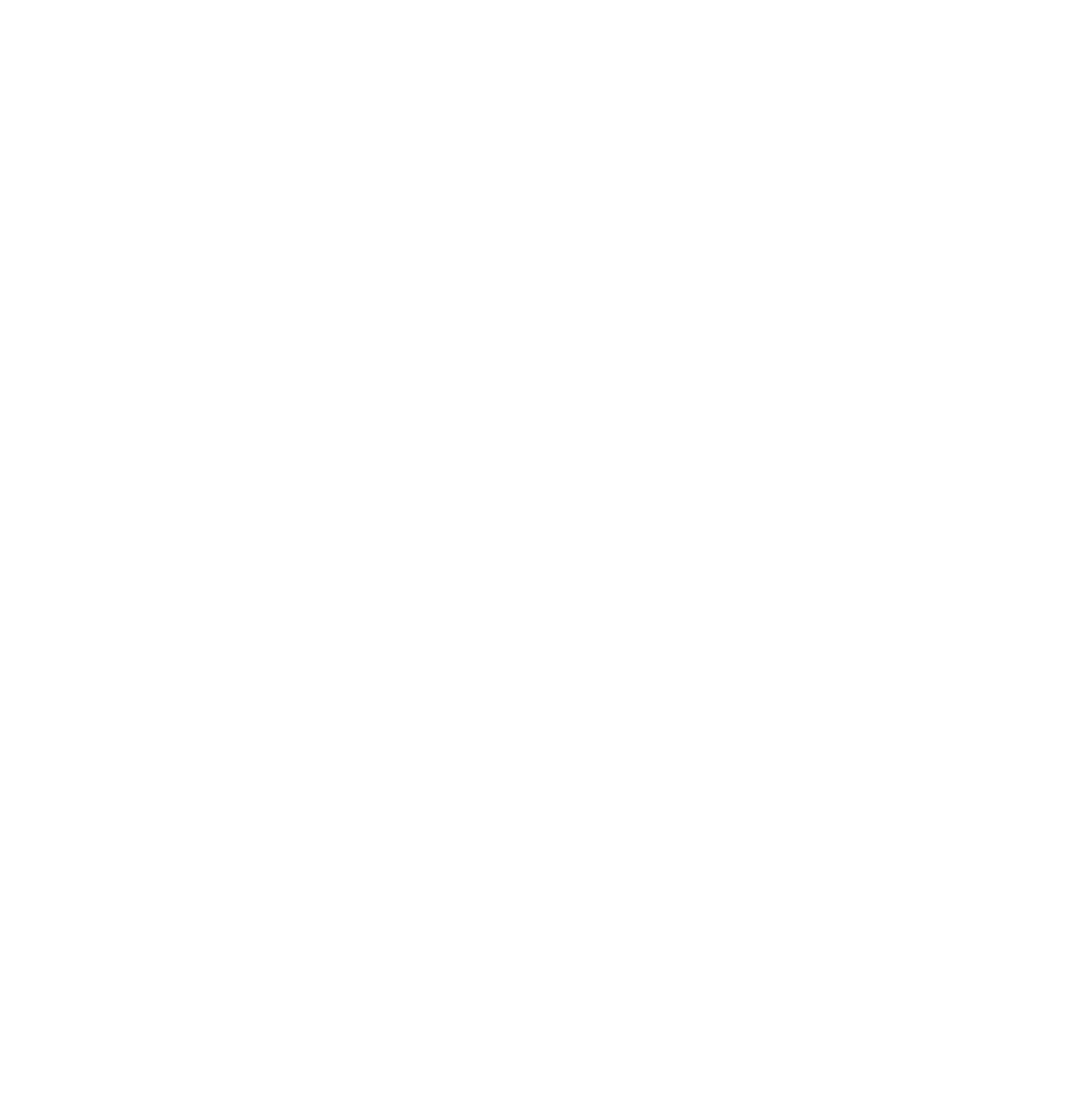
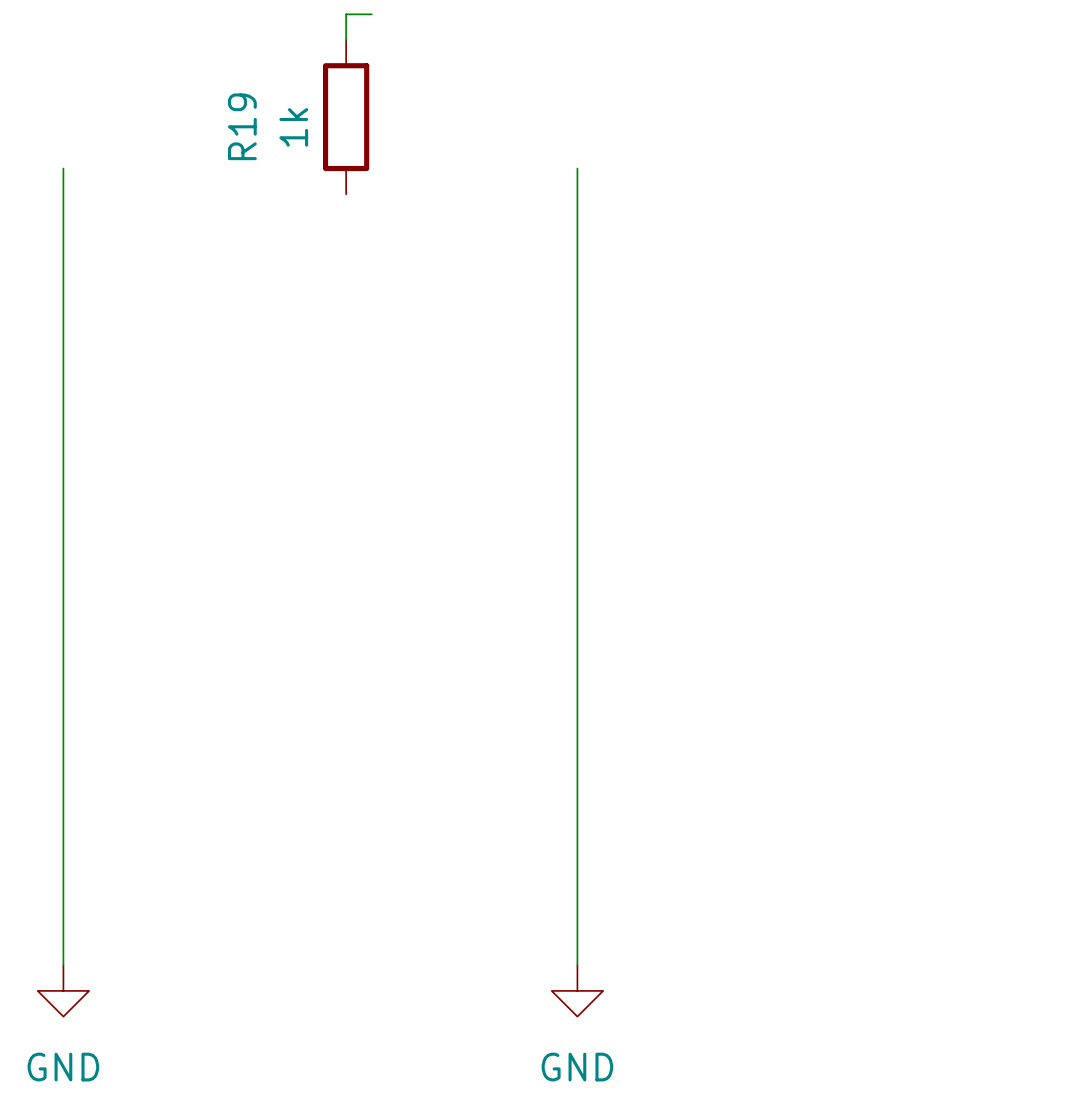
wire: none -> (371, 14) (346, 14) (346, 40)
R19: none -> 1k (346, 117)
wire: none -> (63, 168) (63, 965)
wire: none -> (577, 168) (577, 965)
power symbol: none -> GND (63, 990)
power symbol: none -> GND (577, 990)

